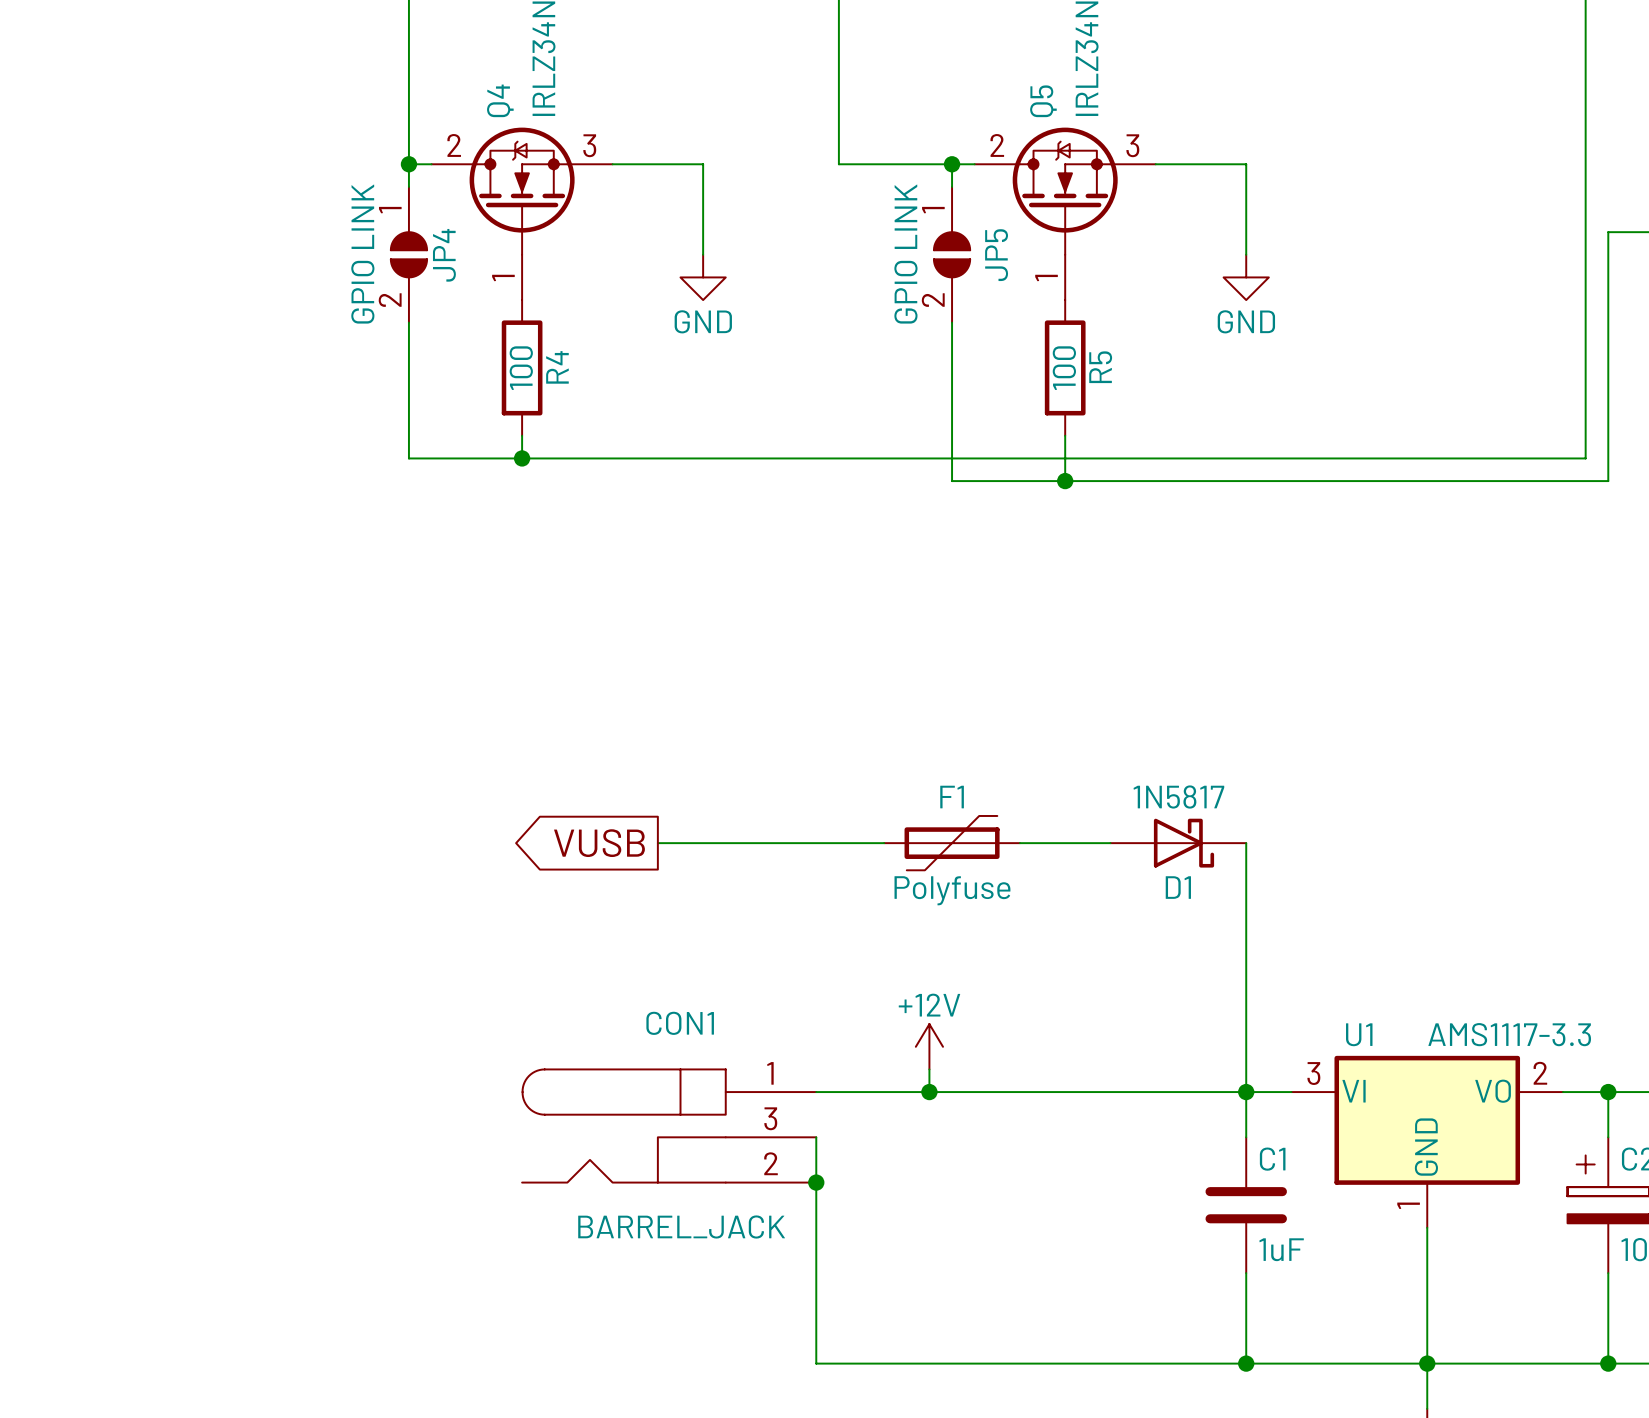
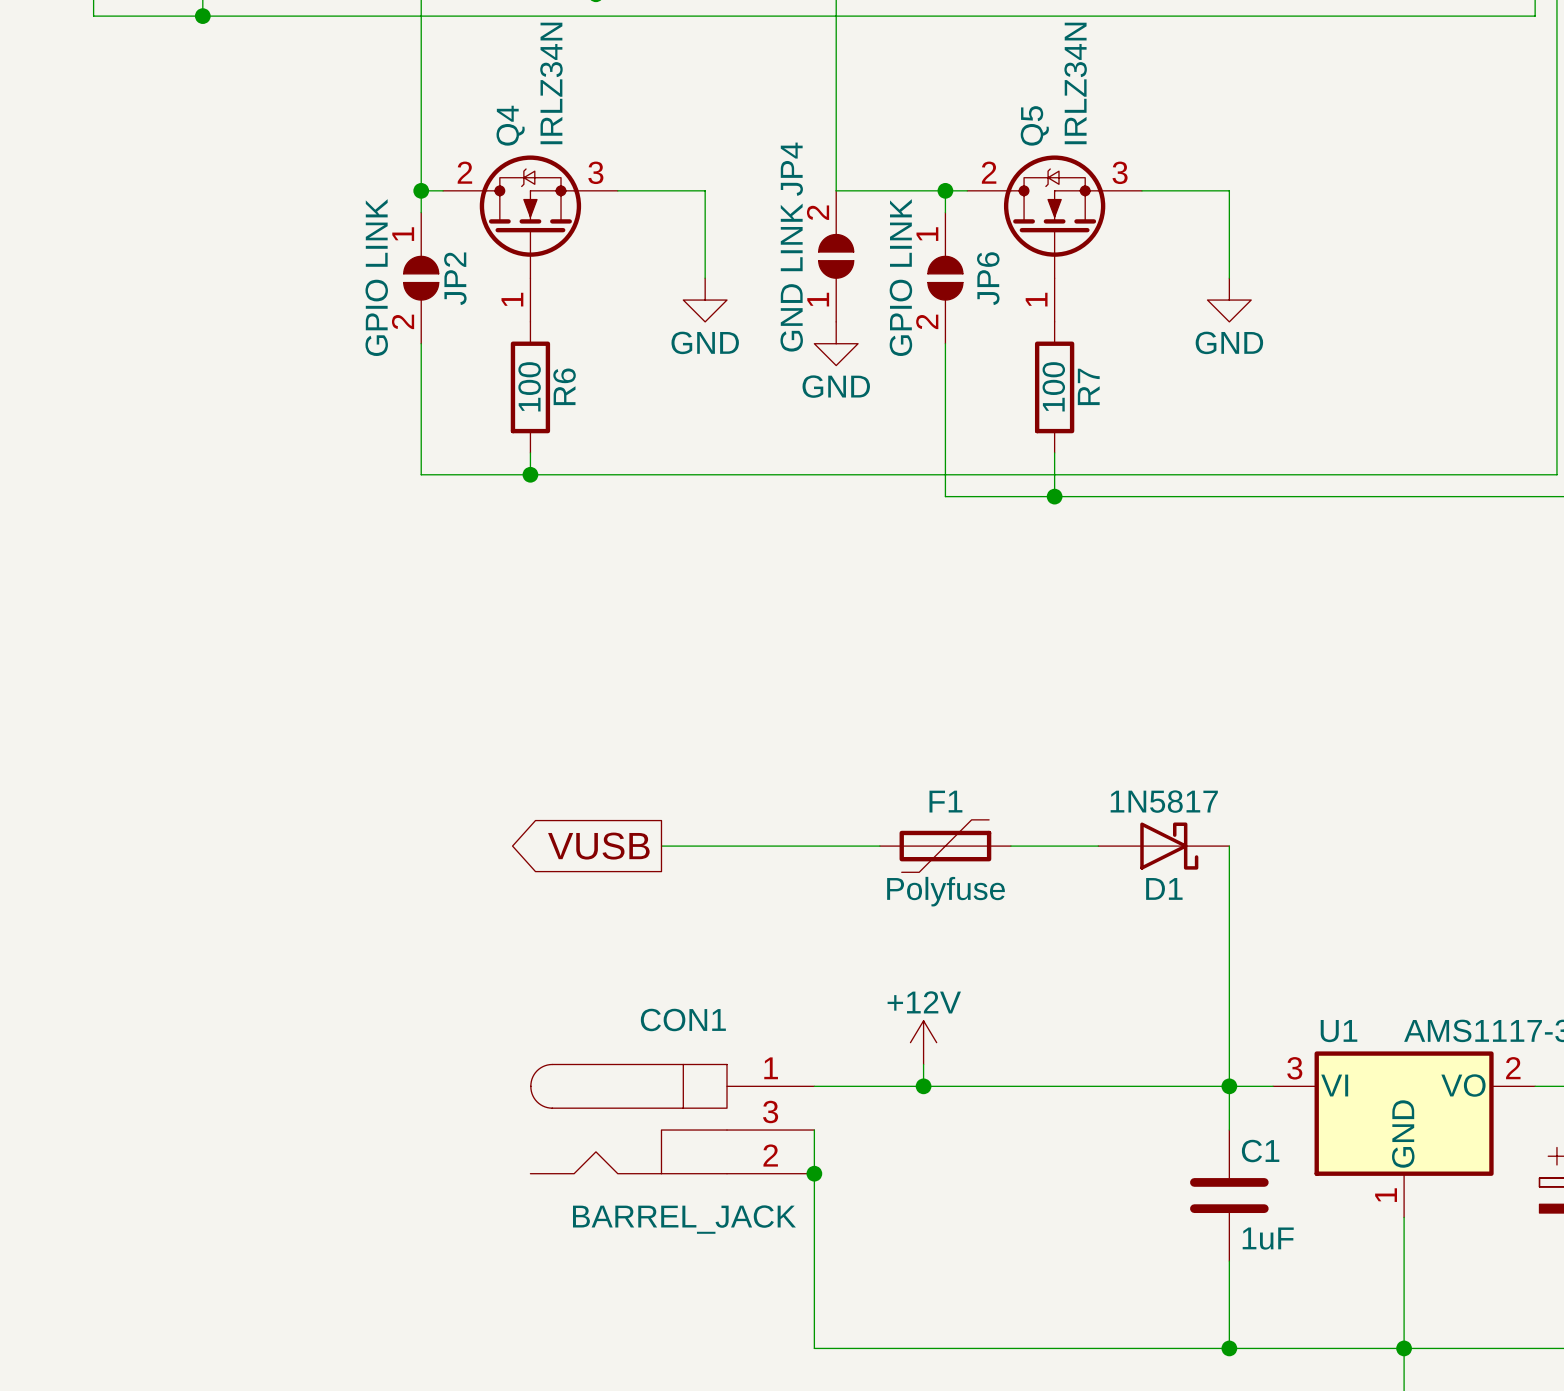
JP4: none -> GND LINK (836, 256)
JP4 name: JP4 (444, 255) -> JP2 (455, 278)
JP5 name: JP5 (996, 255) -> JP6 (988, 278)
power symbol: none -> GND (836, 343)
R4 name: R4 (557, 367) -> R6 (564, 386)
R5 name: R5 (1100, 367) -> R7 (1088, 386)

